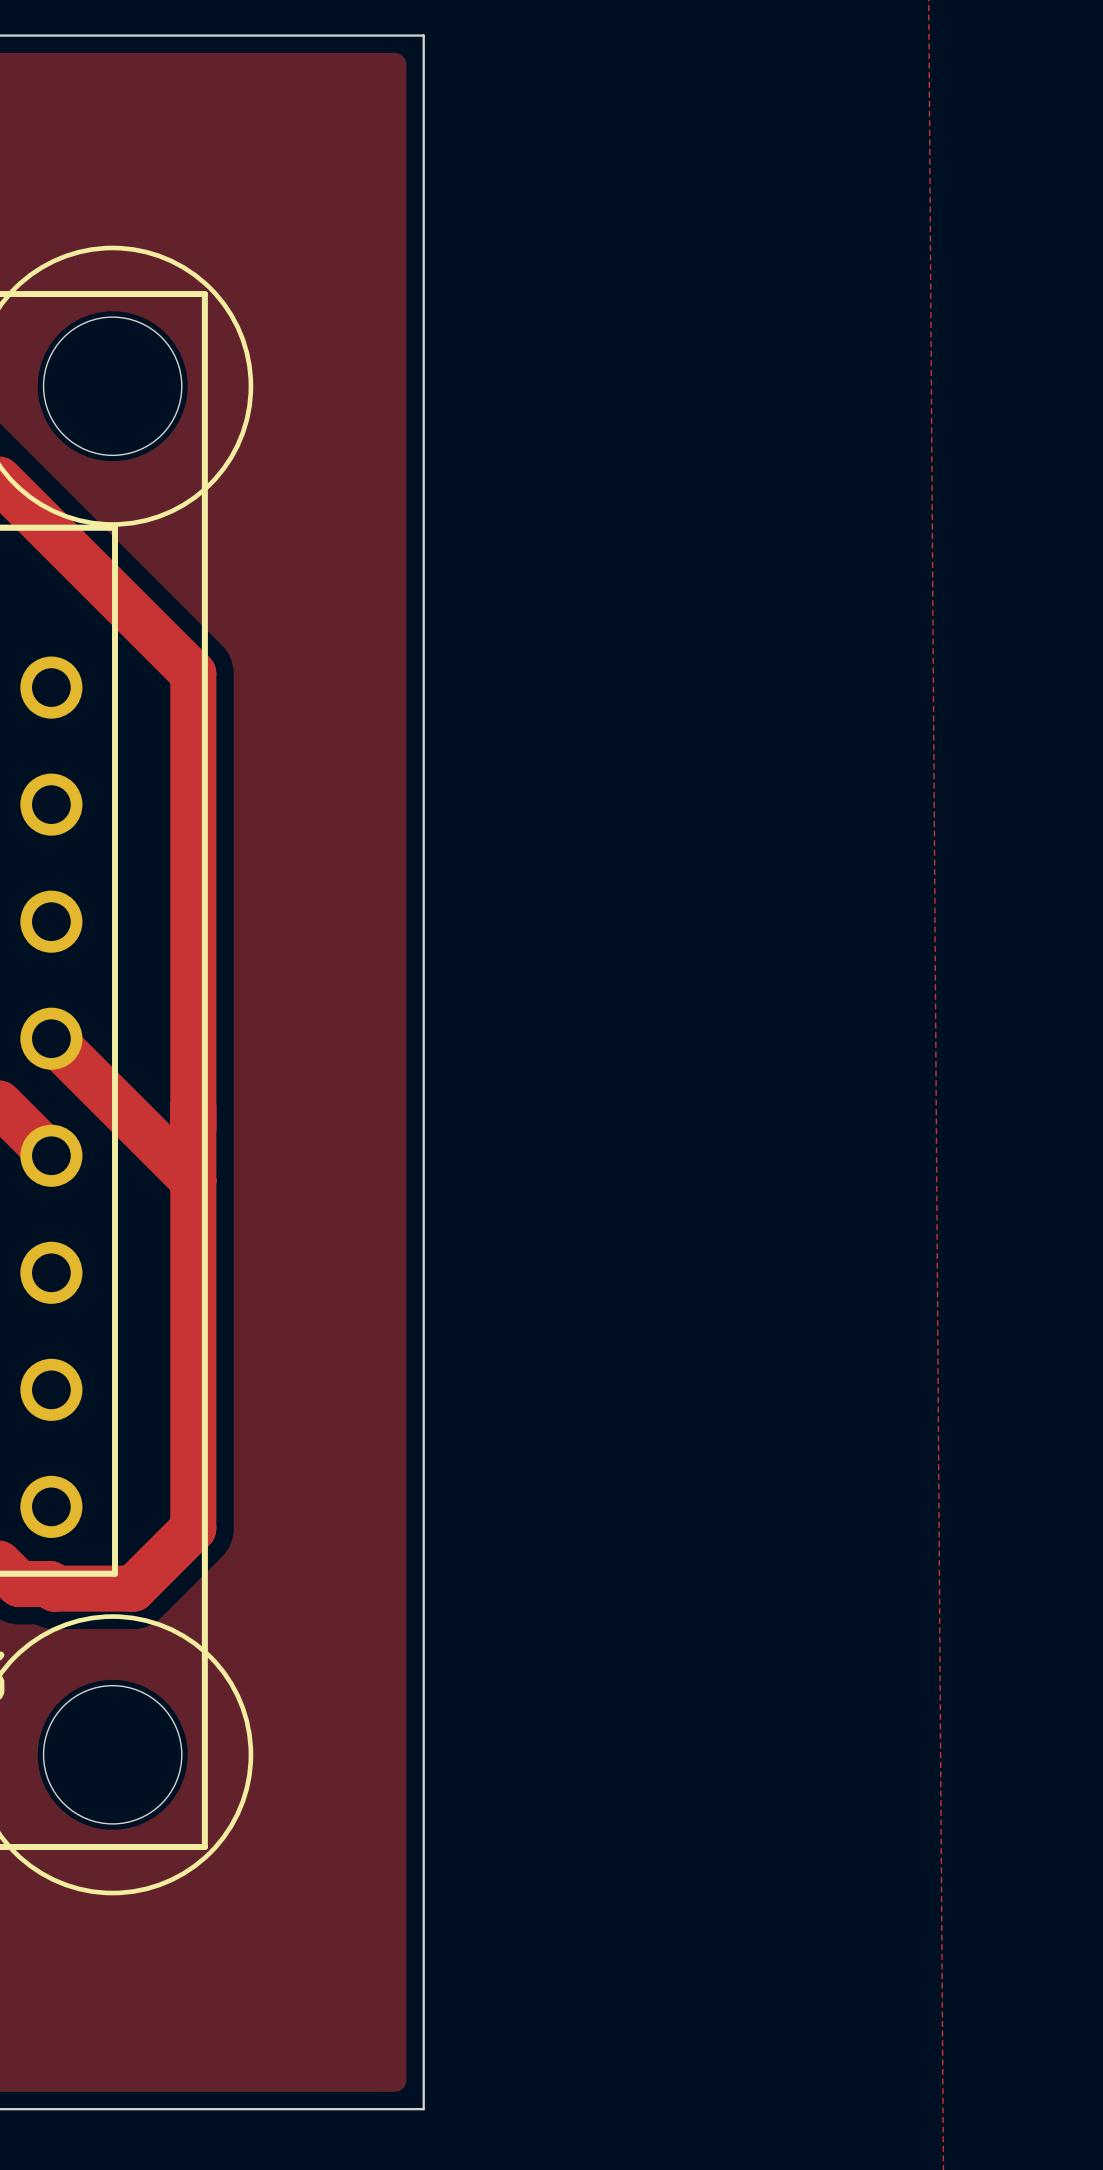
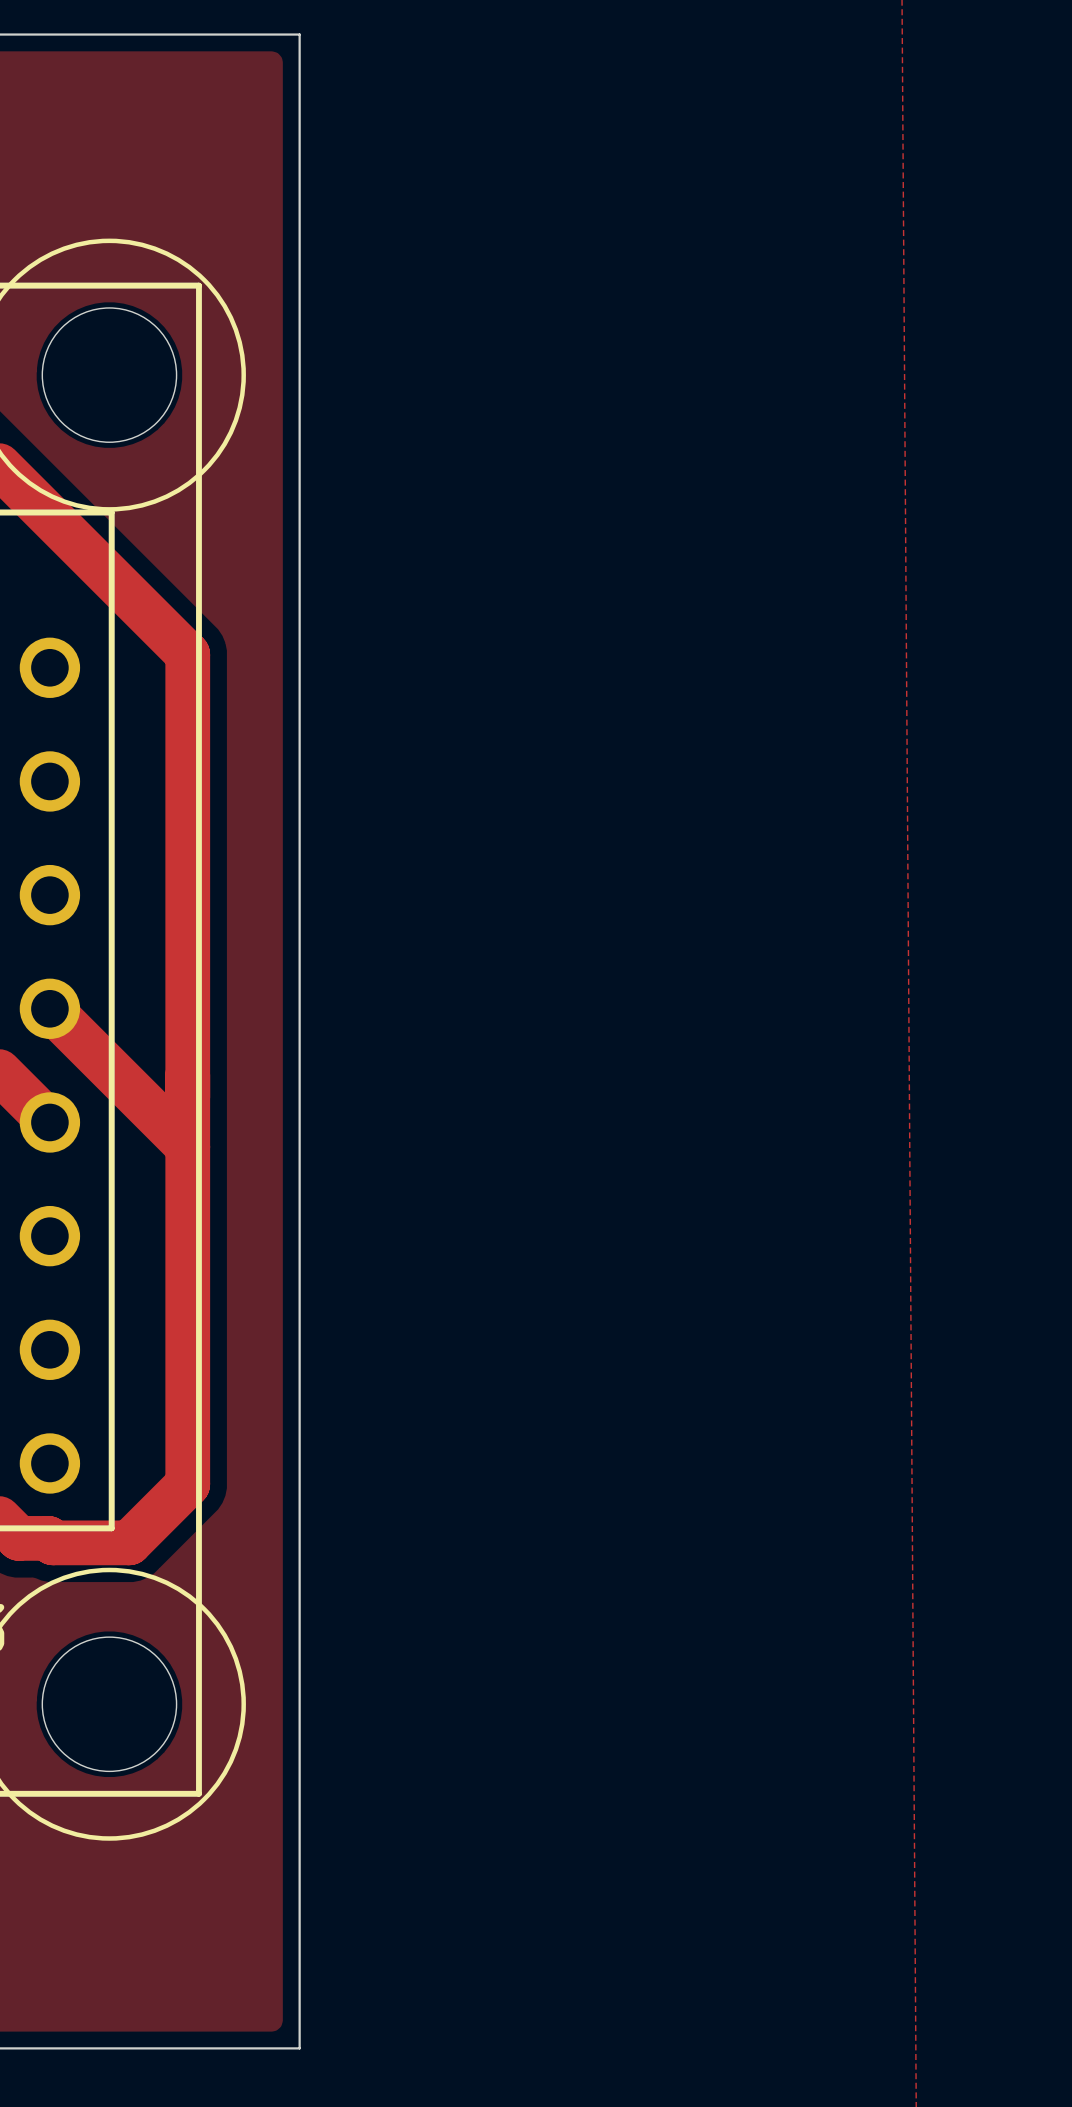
board edge: (308, 35) (423, 35) (423, 2109) (308, 2109) -> (299, 34) (299, 2048)

